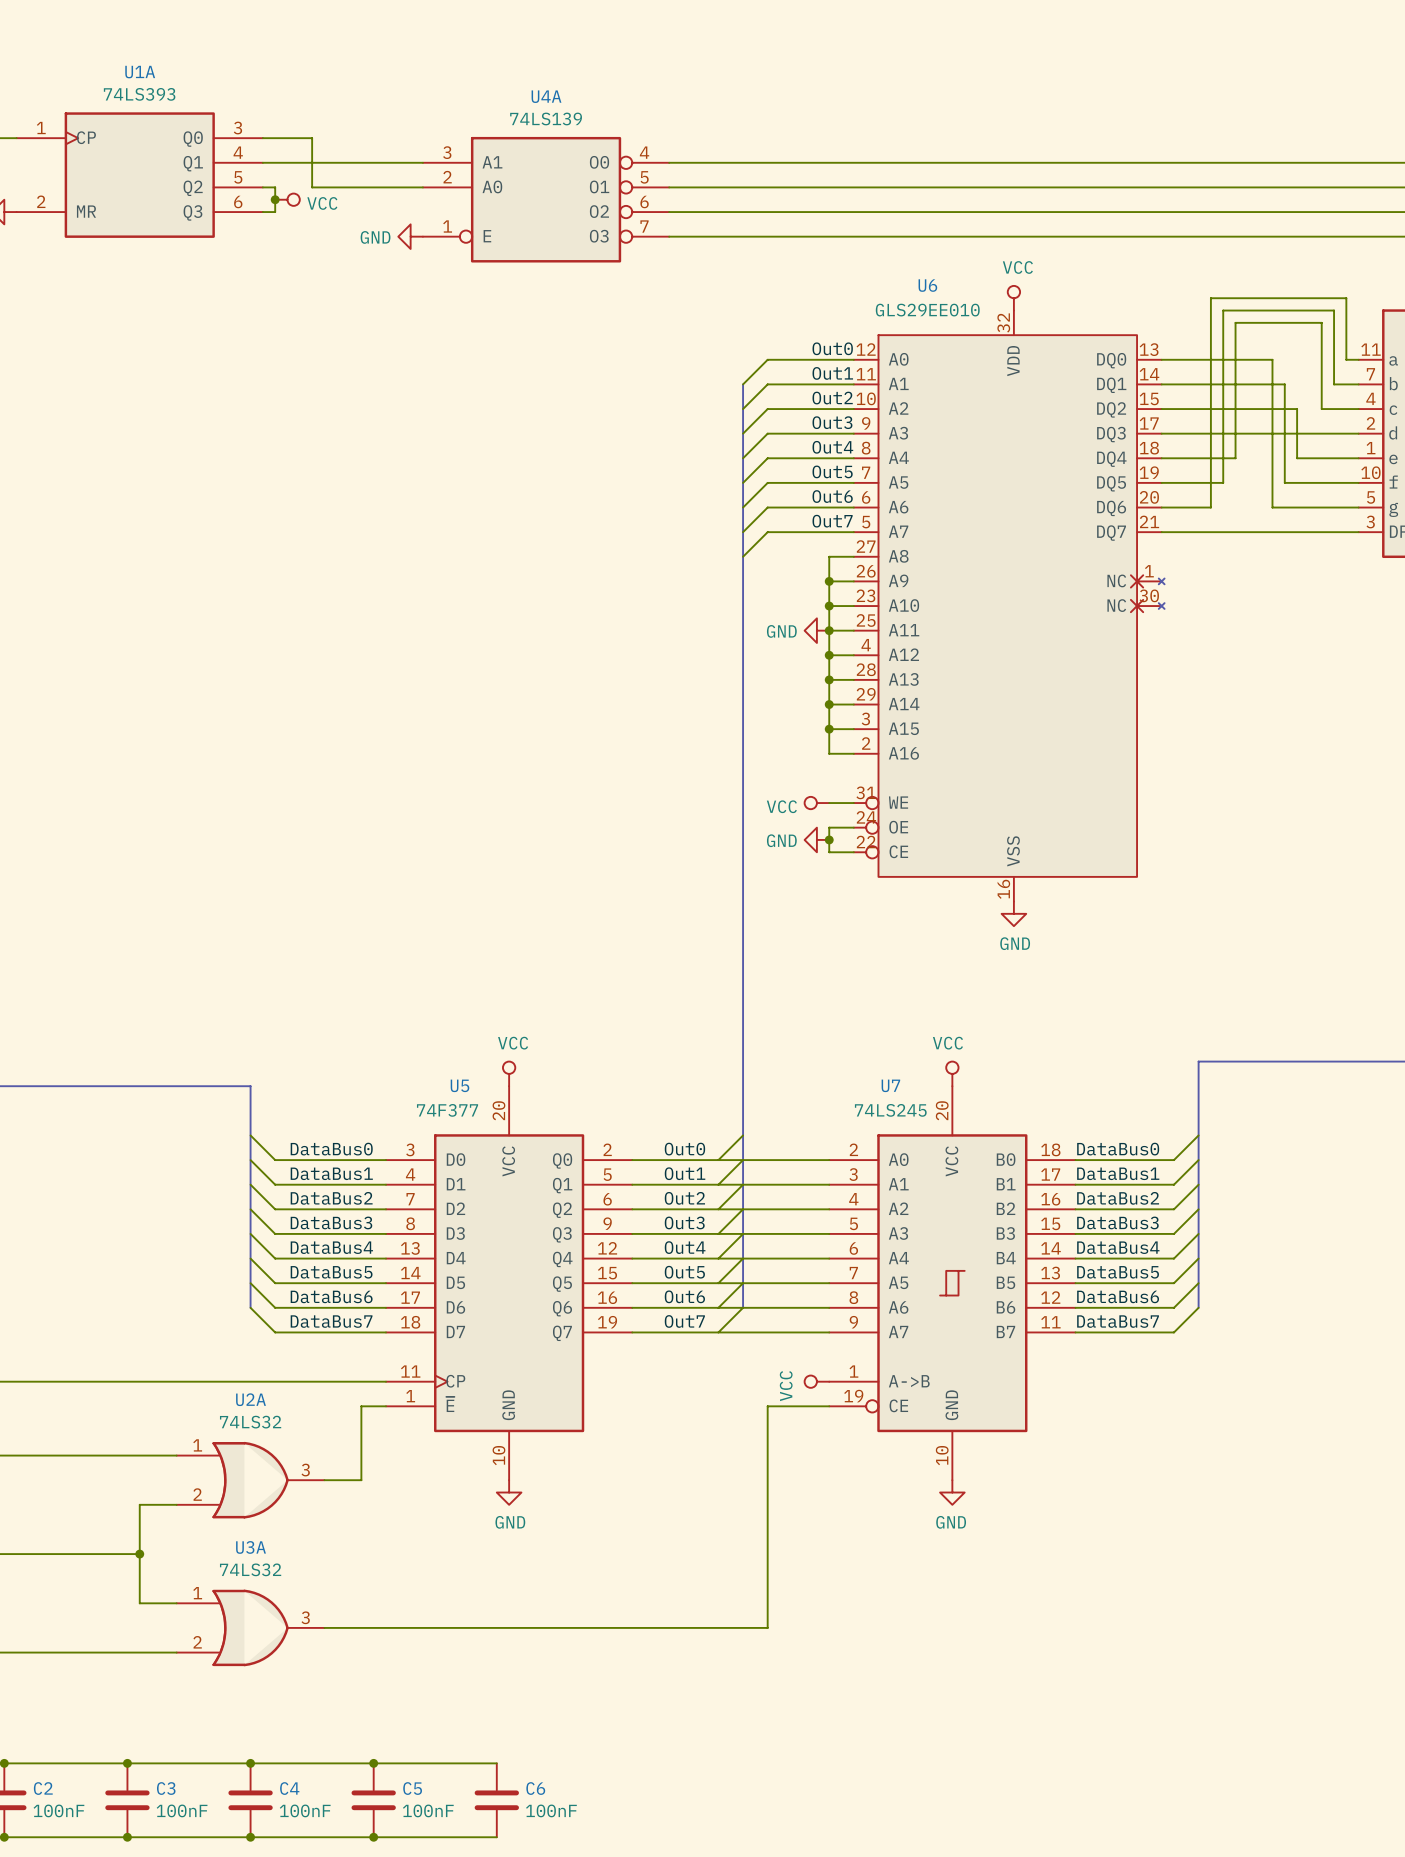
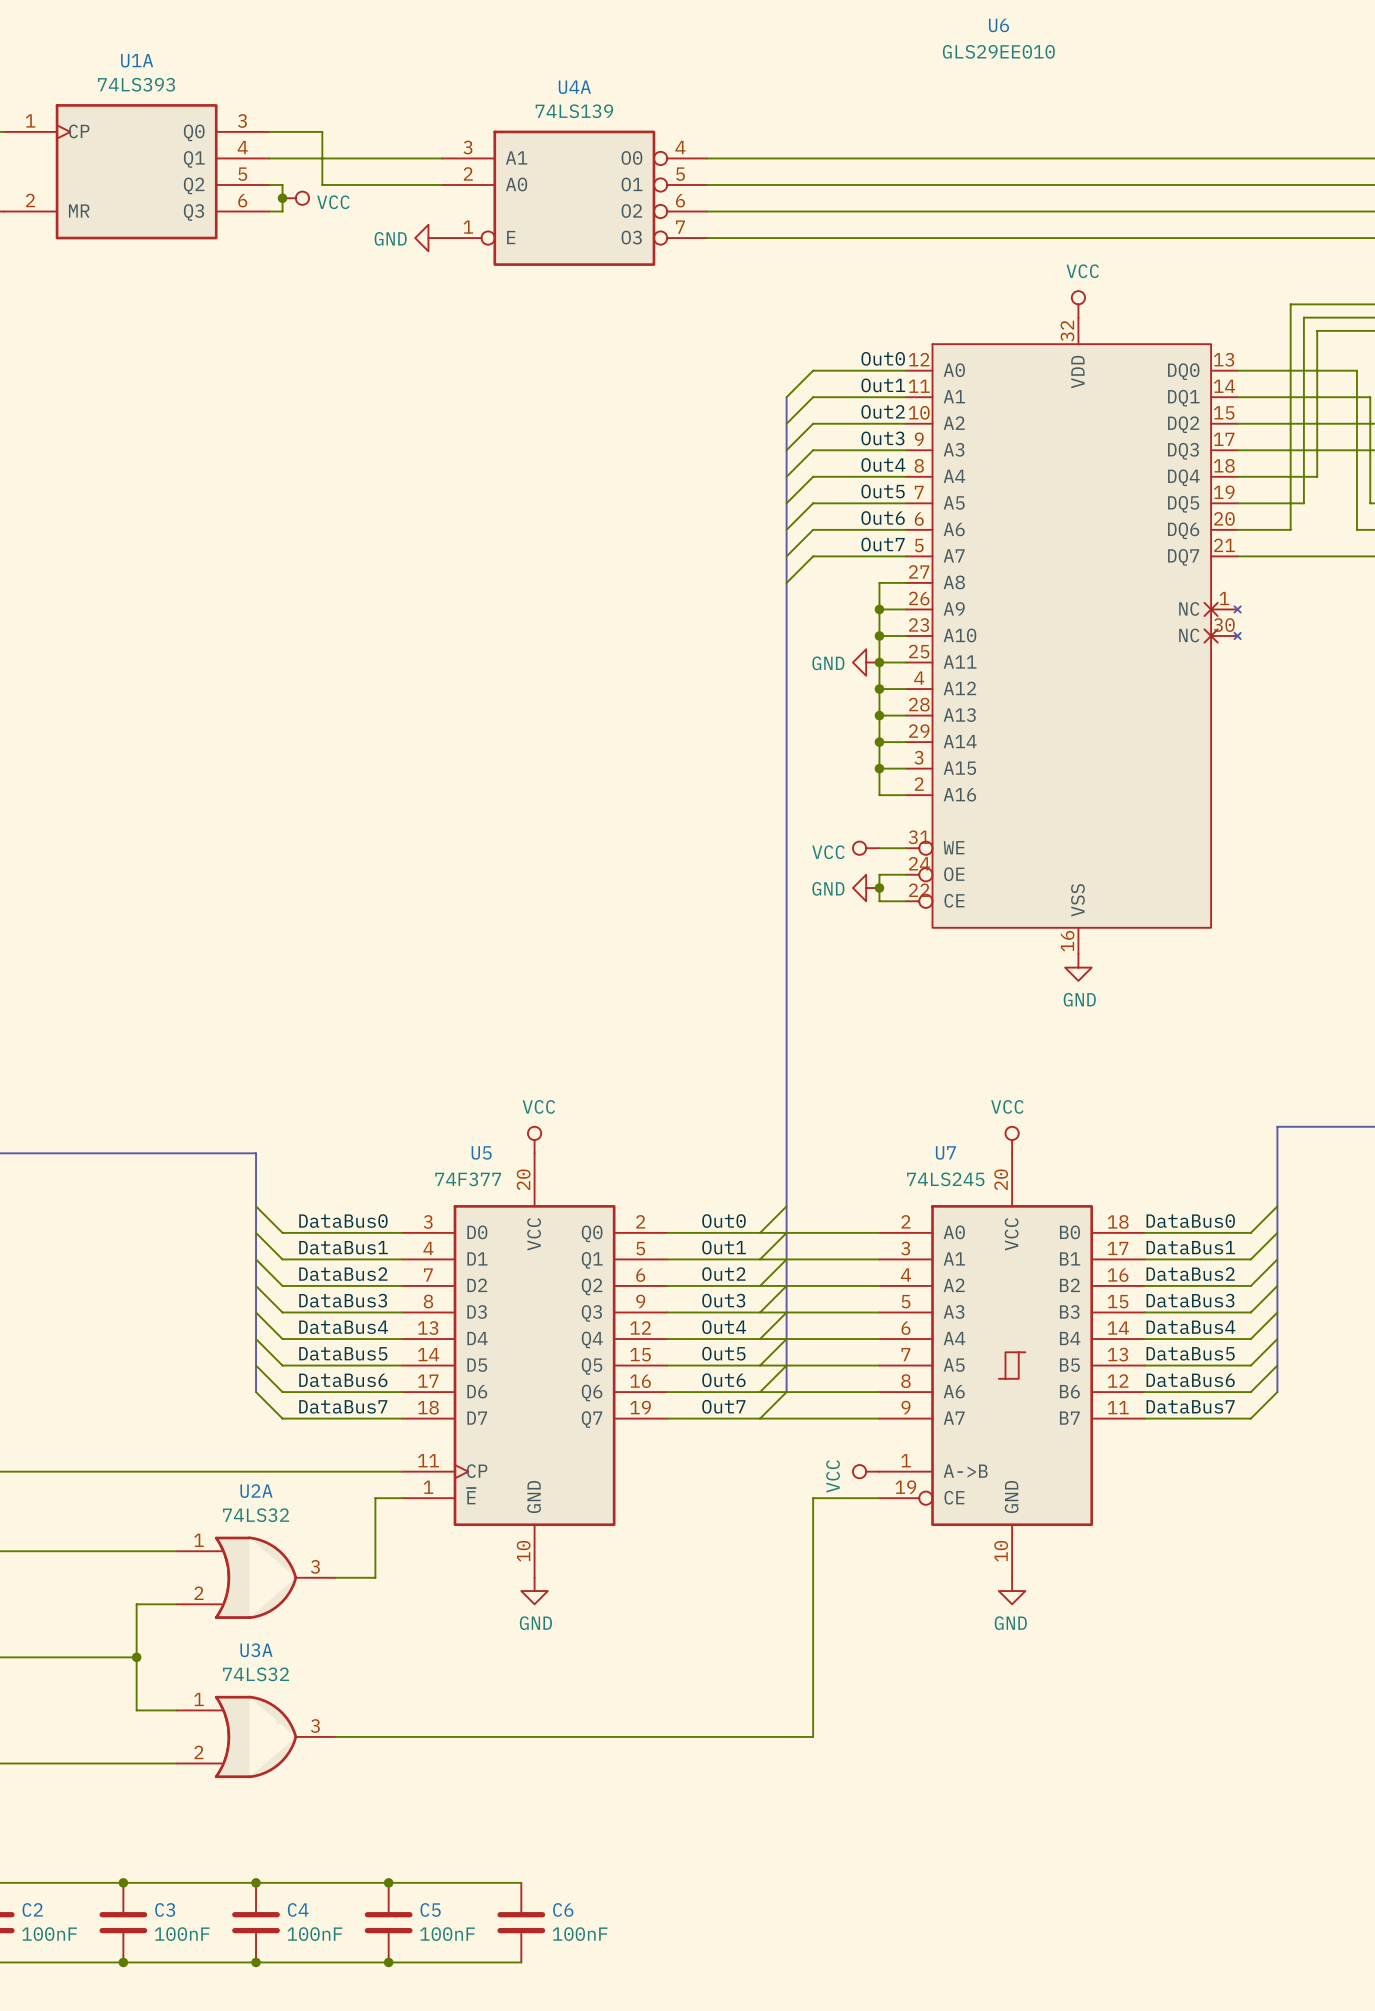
U6 name position: U6 (927, 285) -> U6 (998, 25)
U6 value position: GLS29EE010 (927, 310) -> GLS29EE010 (998, 51)

